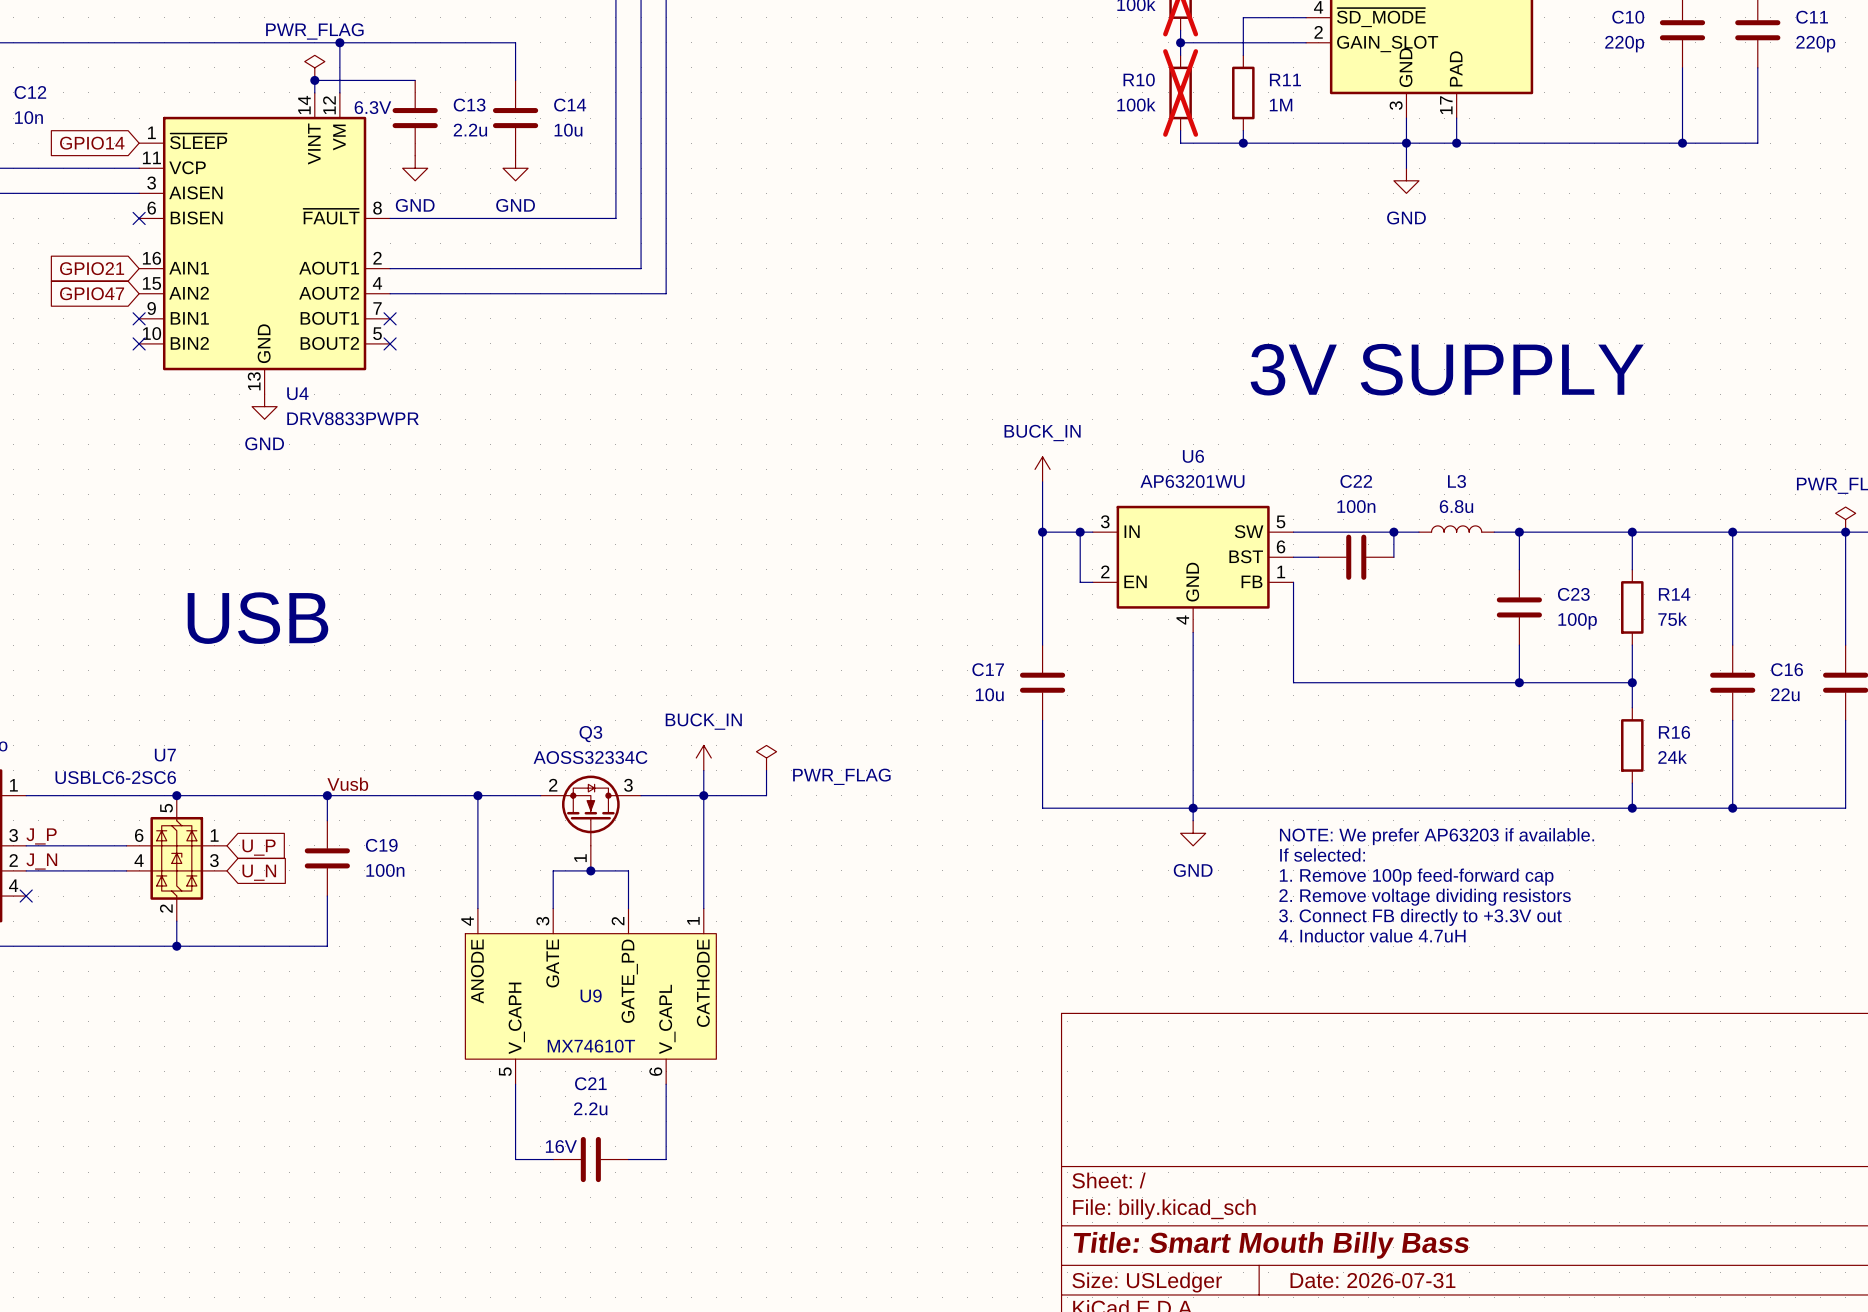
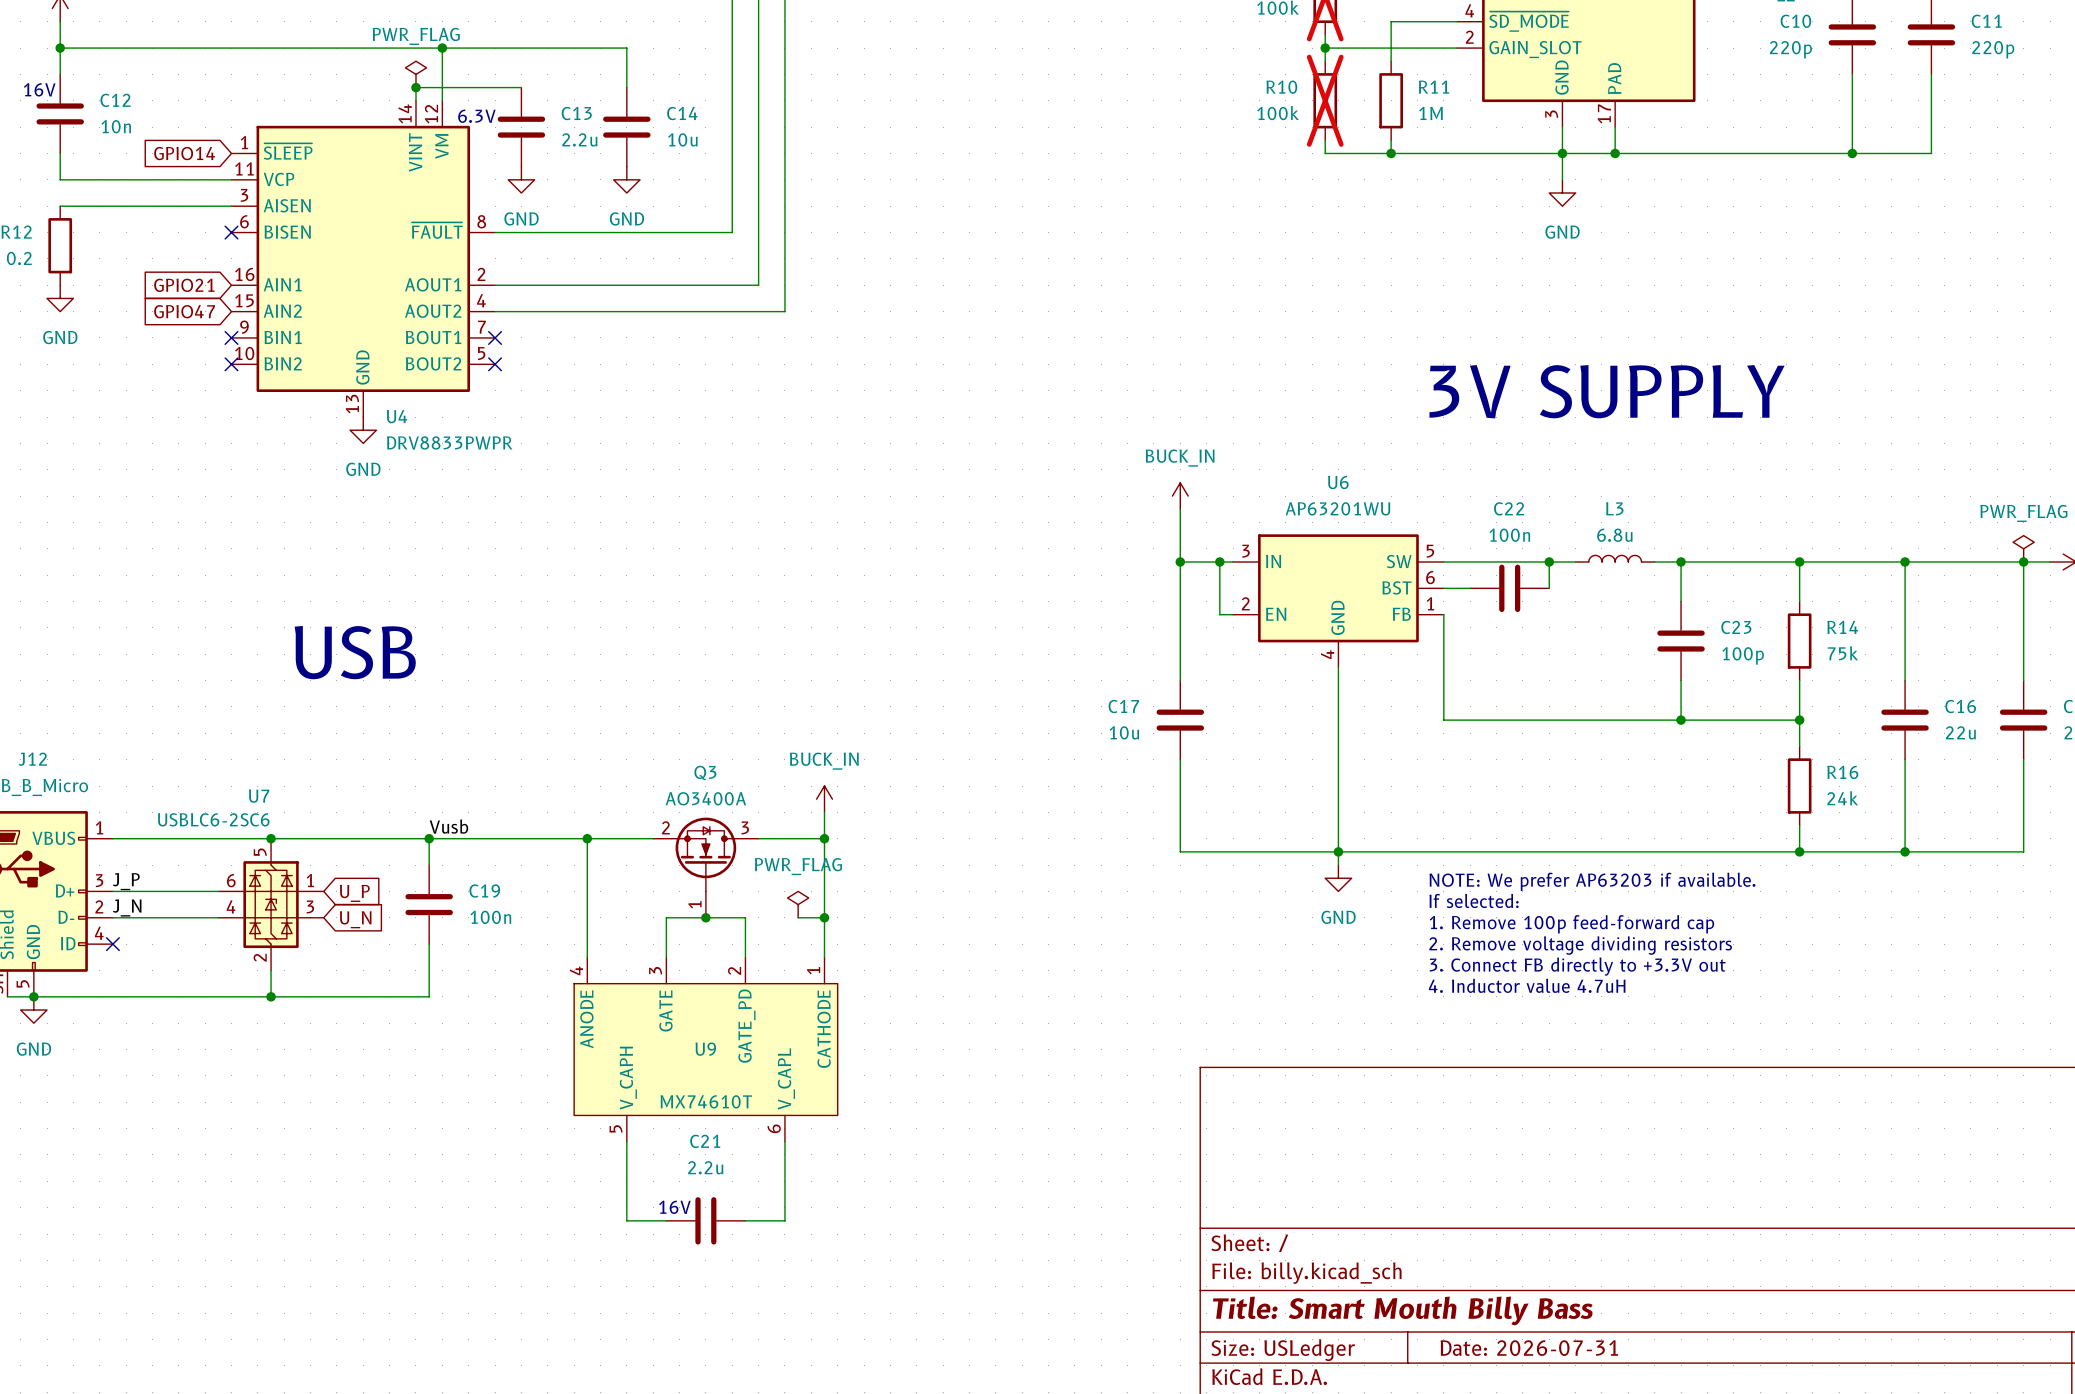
Q3 value: AOSS32334C (590, 757) -> AO3400A (705, 798)
power symbol position: PWR_FLAG (766, 758) -> PWR_FLAG (798, 904)
wire: (766, 770) (766, 795) (703, 795) -> none
power symbol text position: PWR_FLAG (841, 776) -> PWR_FLAG (798, 866)
wire: none -> (798, 917) (824, 917)
junction: none -> (824, 917)

